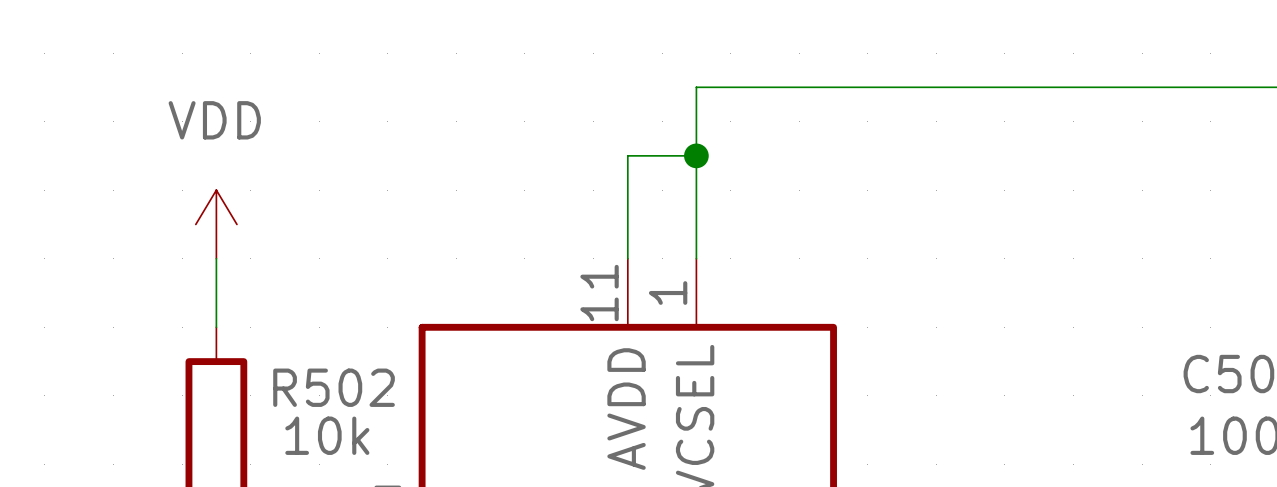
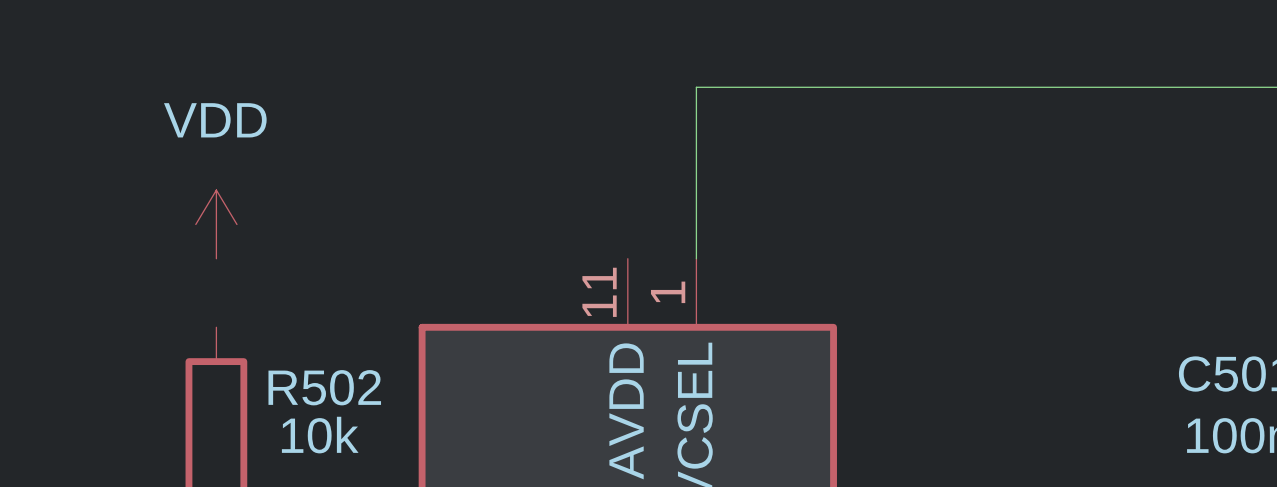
wire: (696, 155) (627, 155) (627, 258) -> none
junction: (696, 155) -> none
wire: (216, 258) (216, 327) -> none

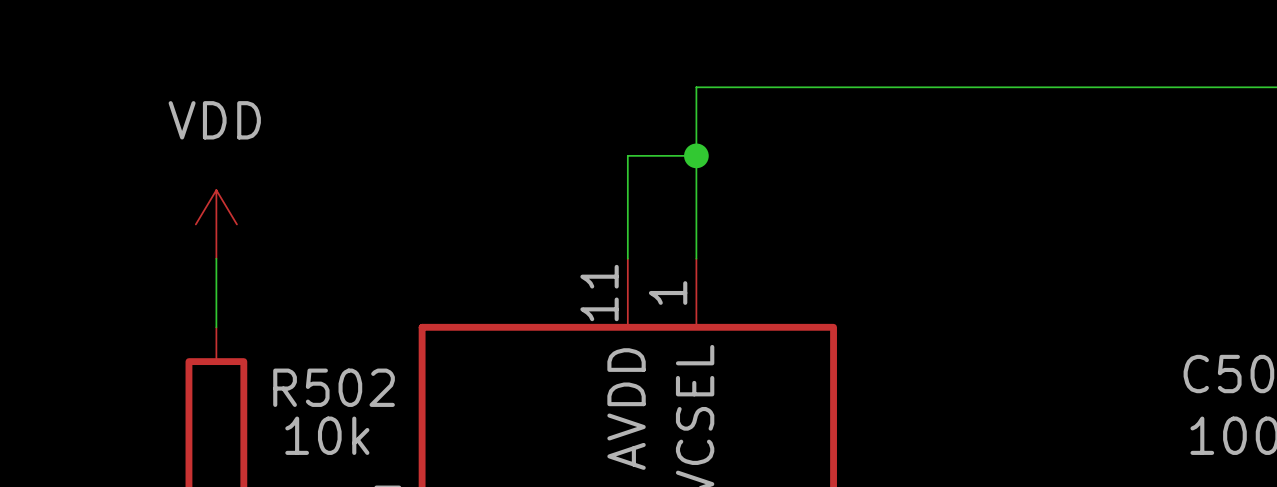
wire: none -> (696, 155) (627, 155) (627, 258)
junction: none -> (696, 155)
wire: none -> (216, 258) (216, 327)

